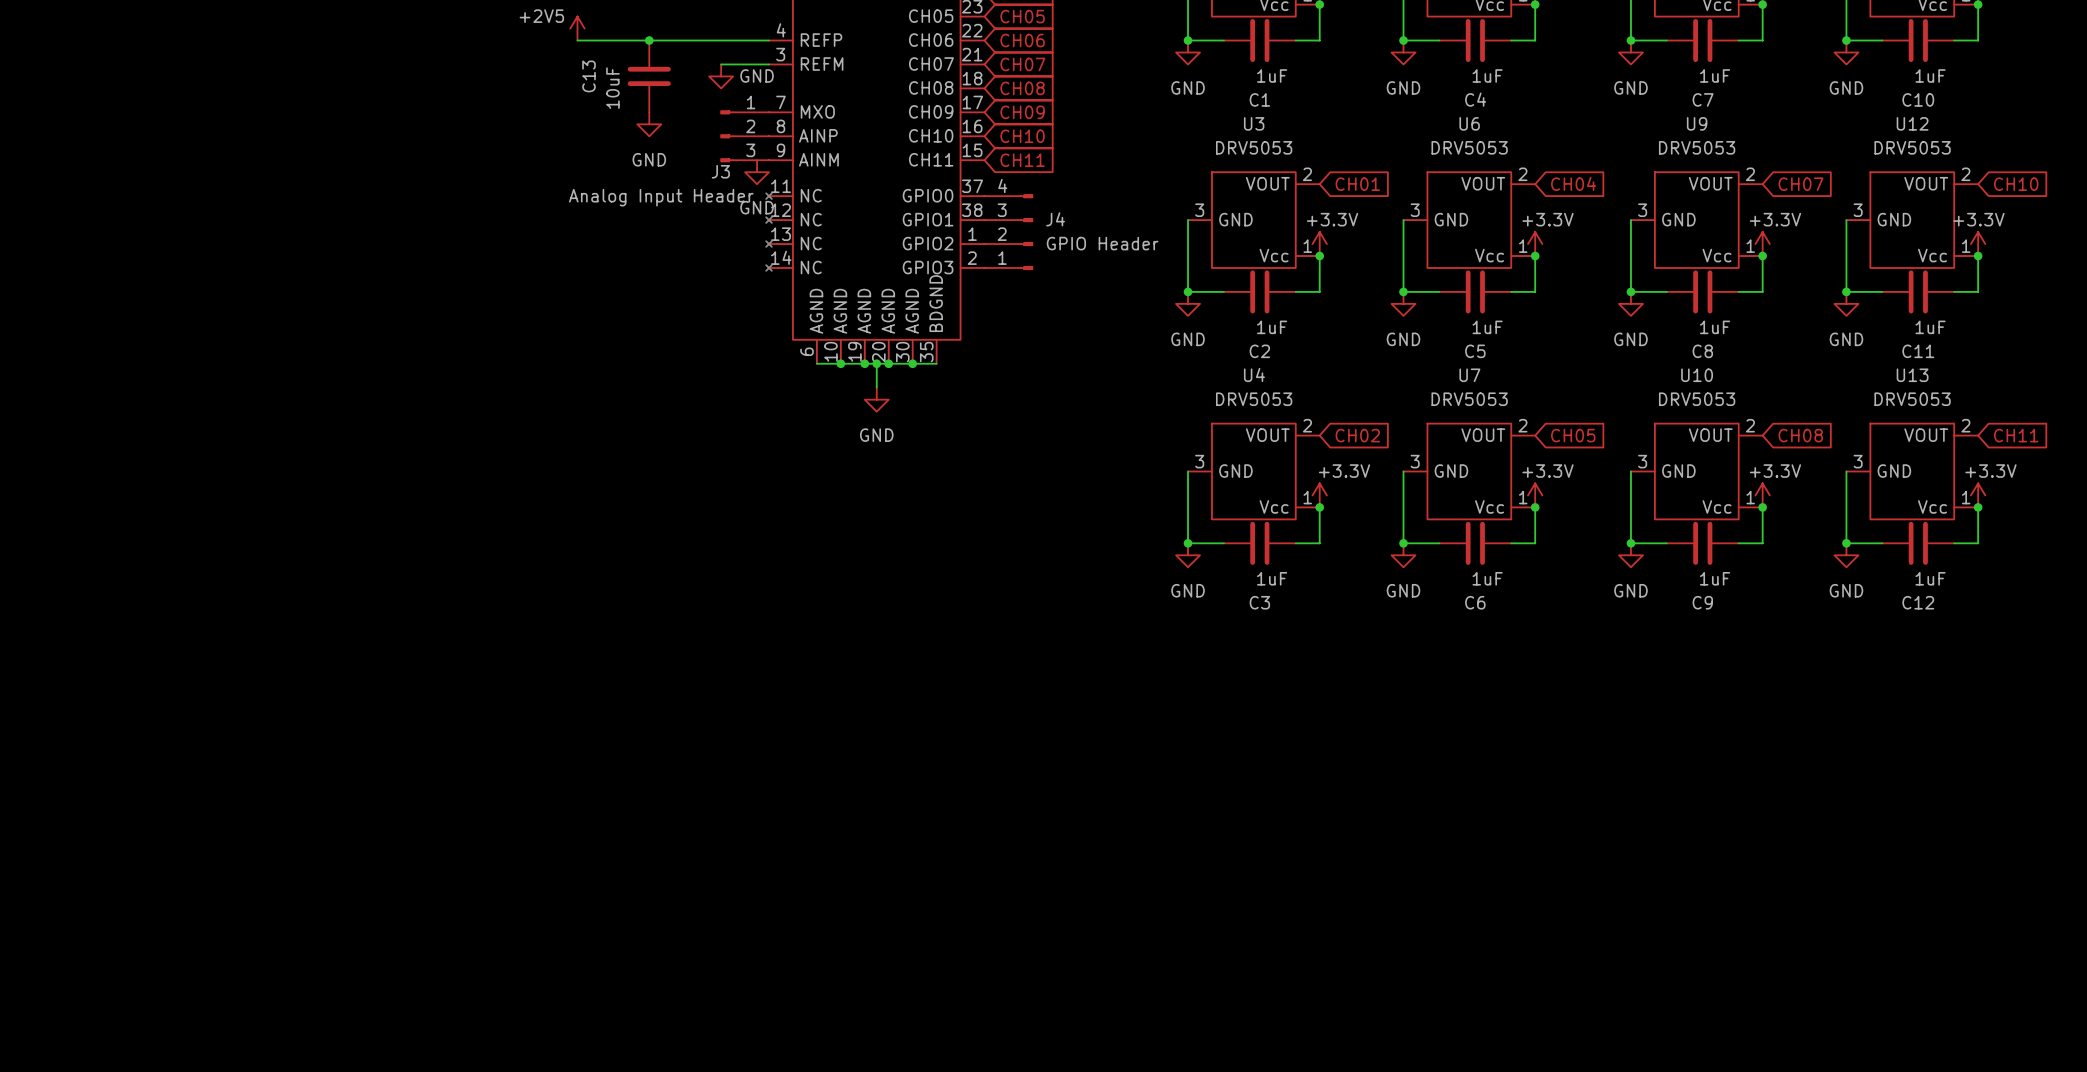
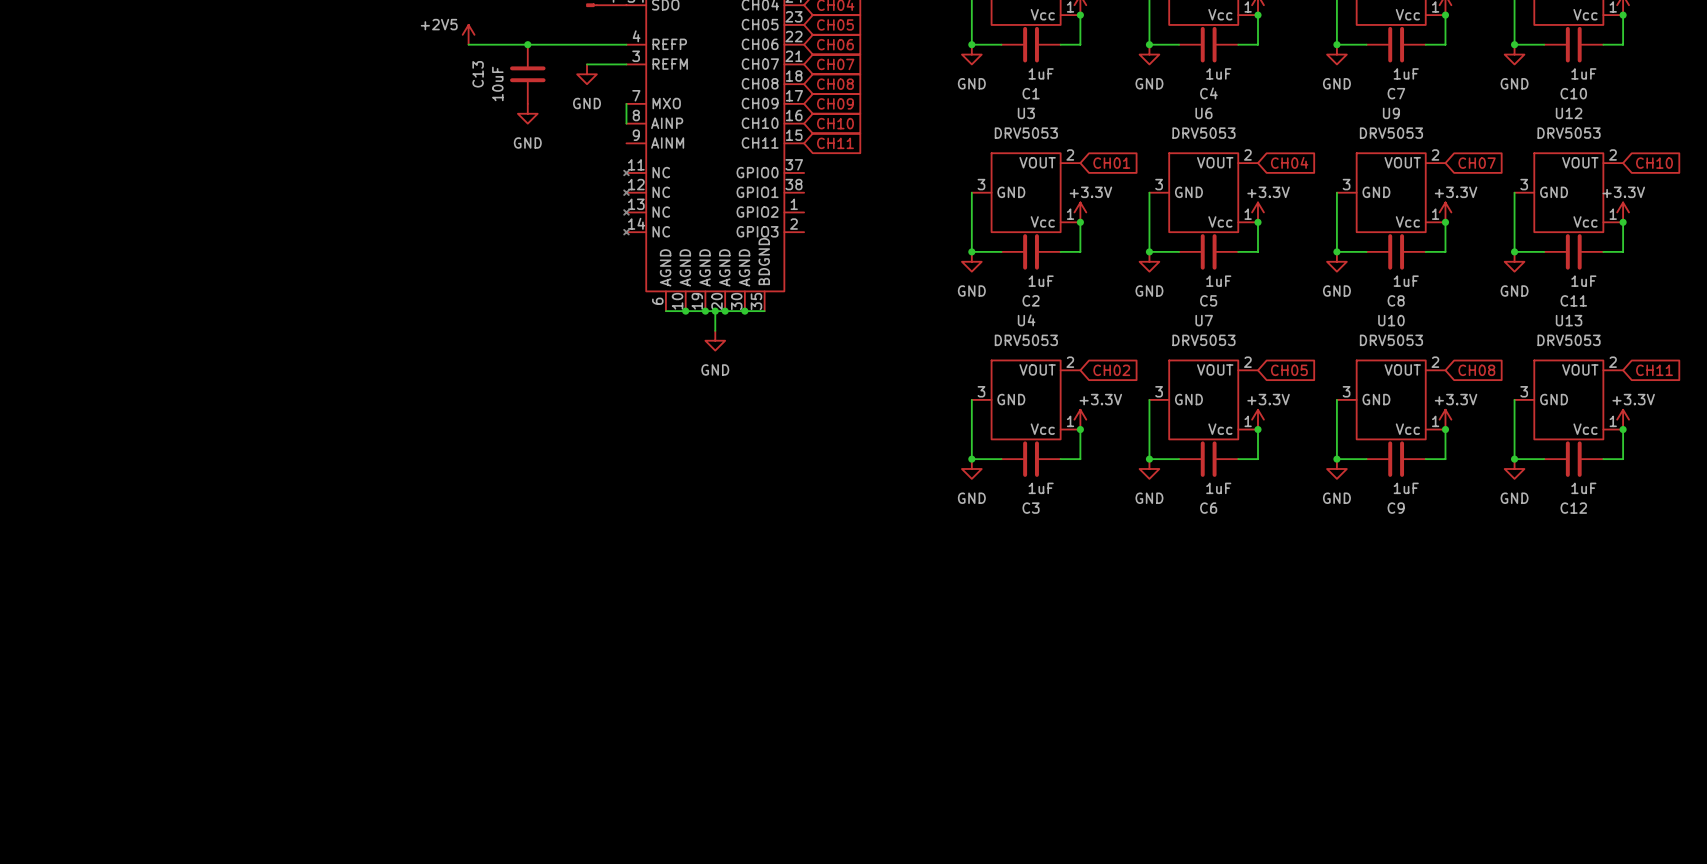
power symbol text position: GND (757, 75) -> GND (587, 103)
wire: none -> (626, 103) (626, 123)
J3: Analog Input Header (744, 136) -> none
power symbol: GND (757, 172) -> none
J4: GPIO Header (1008, 232) -> none

